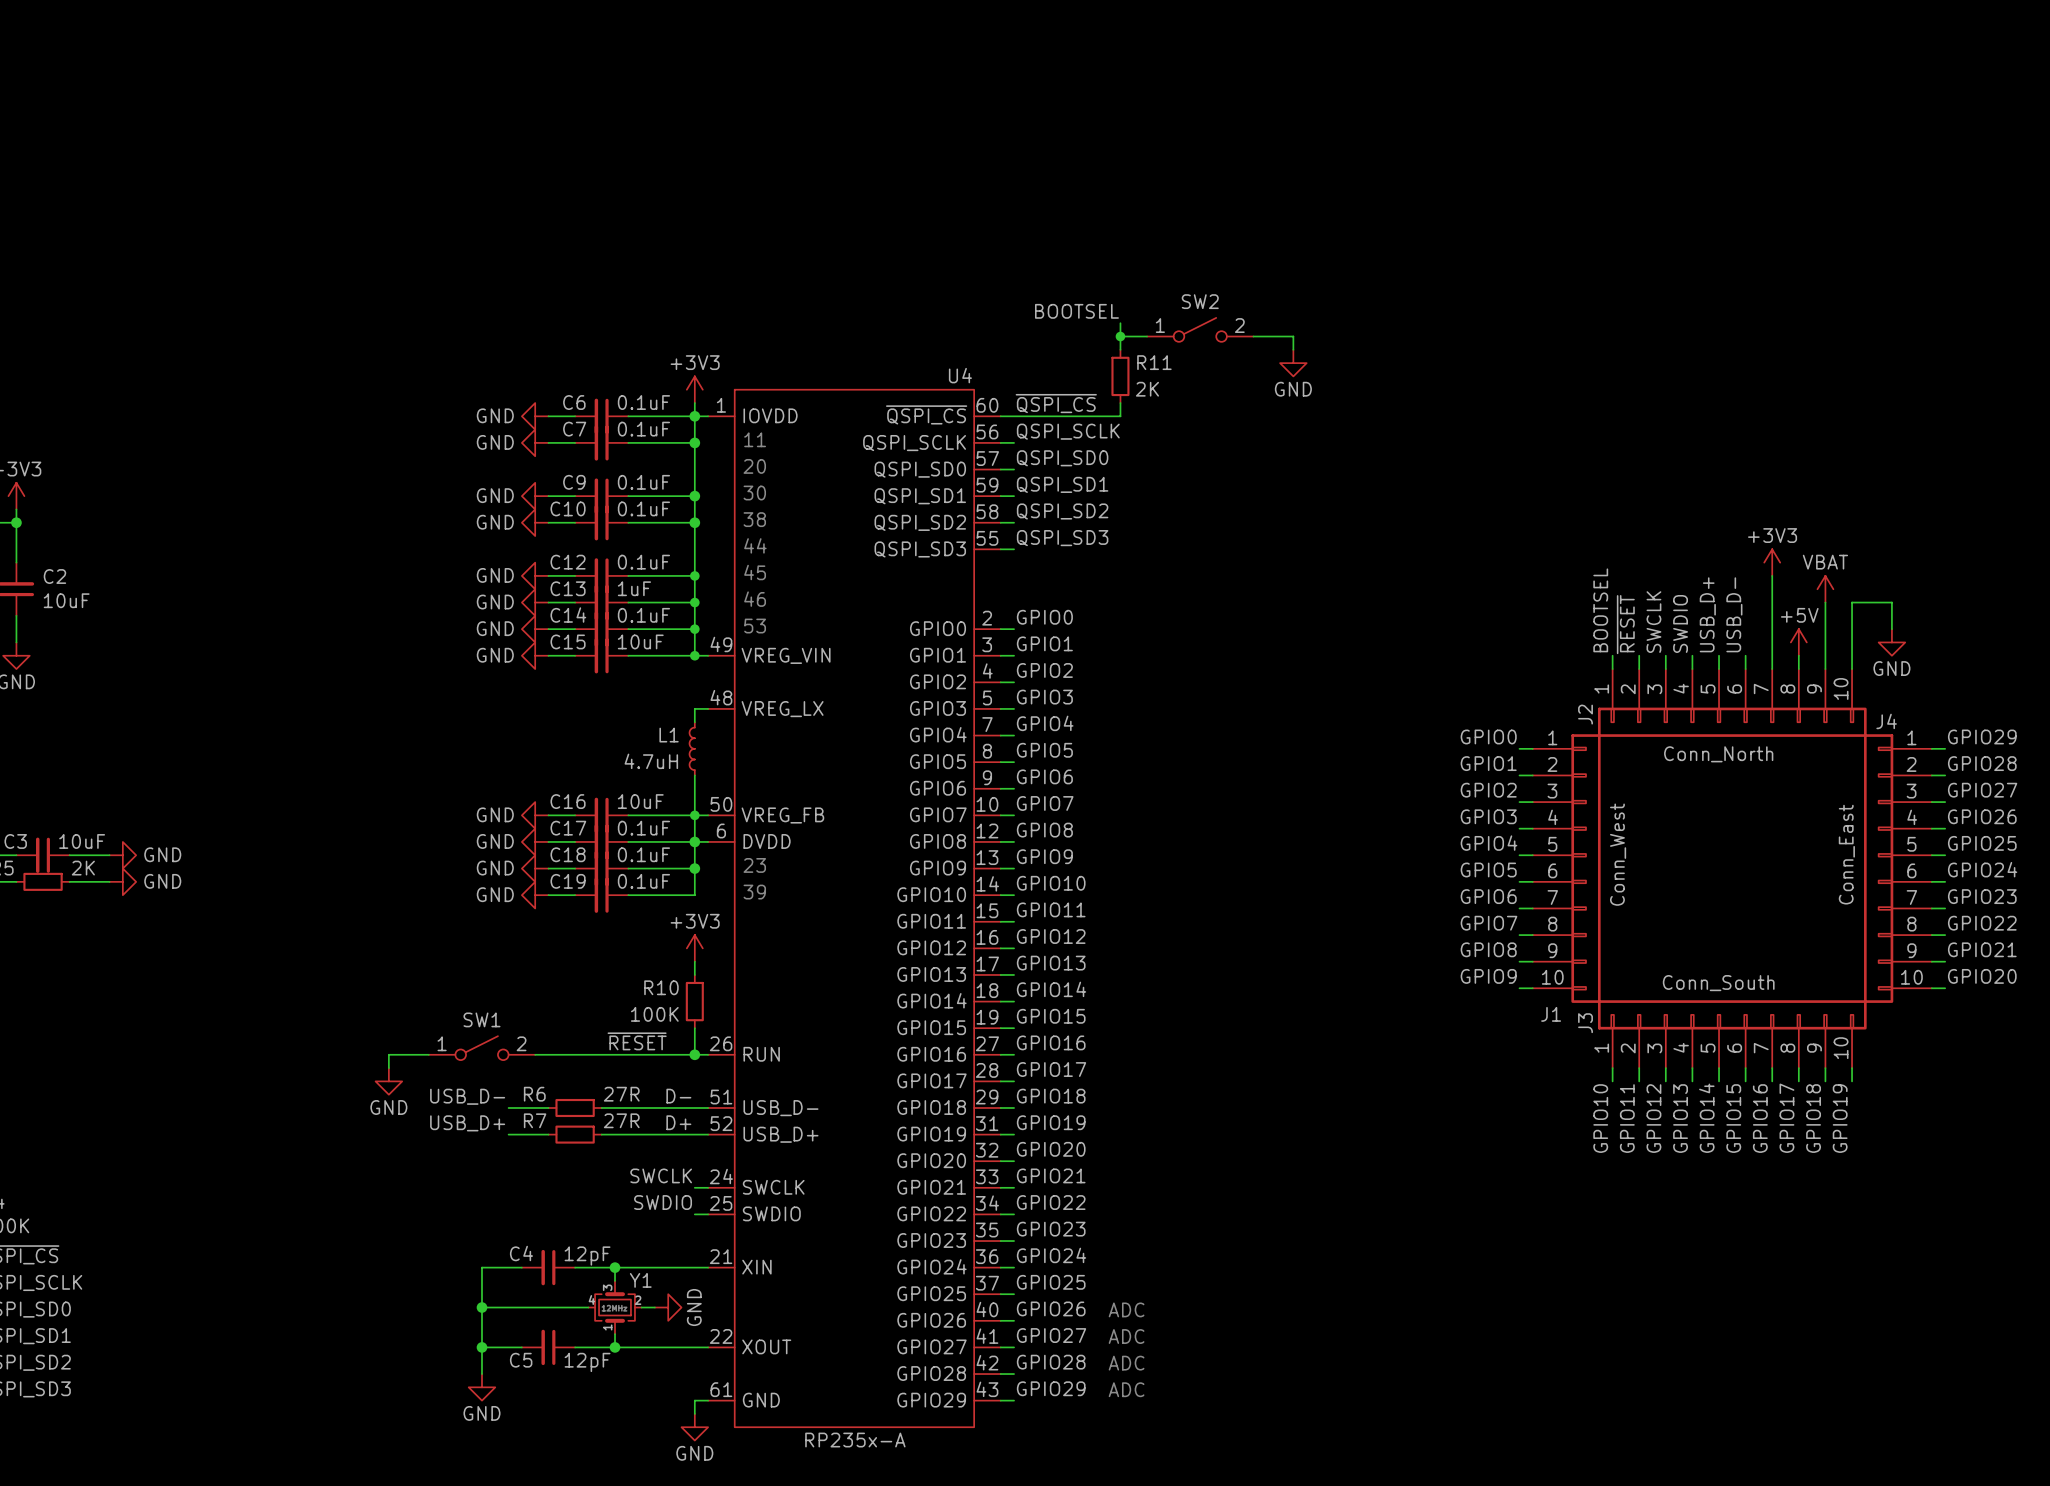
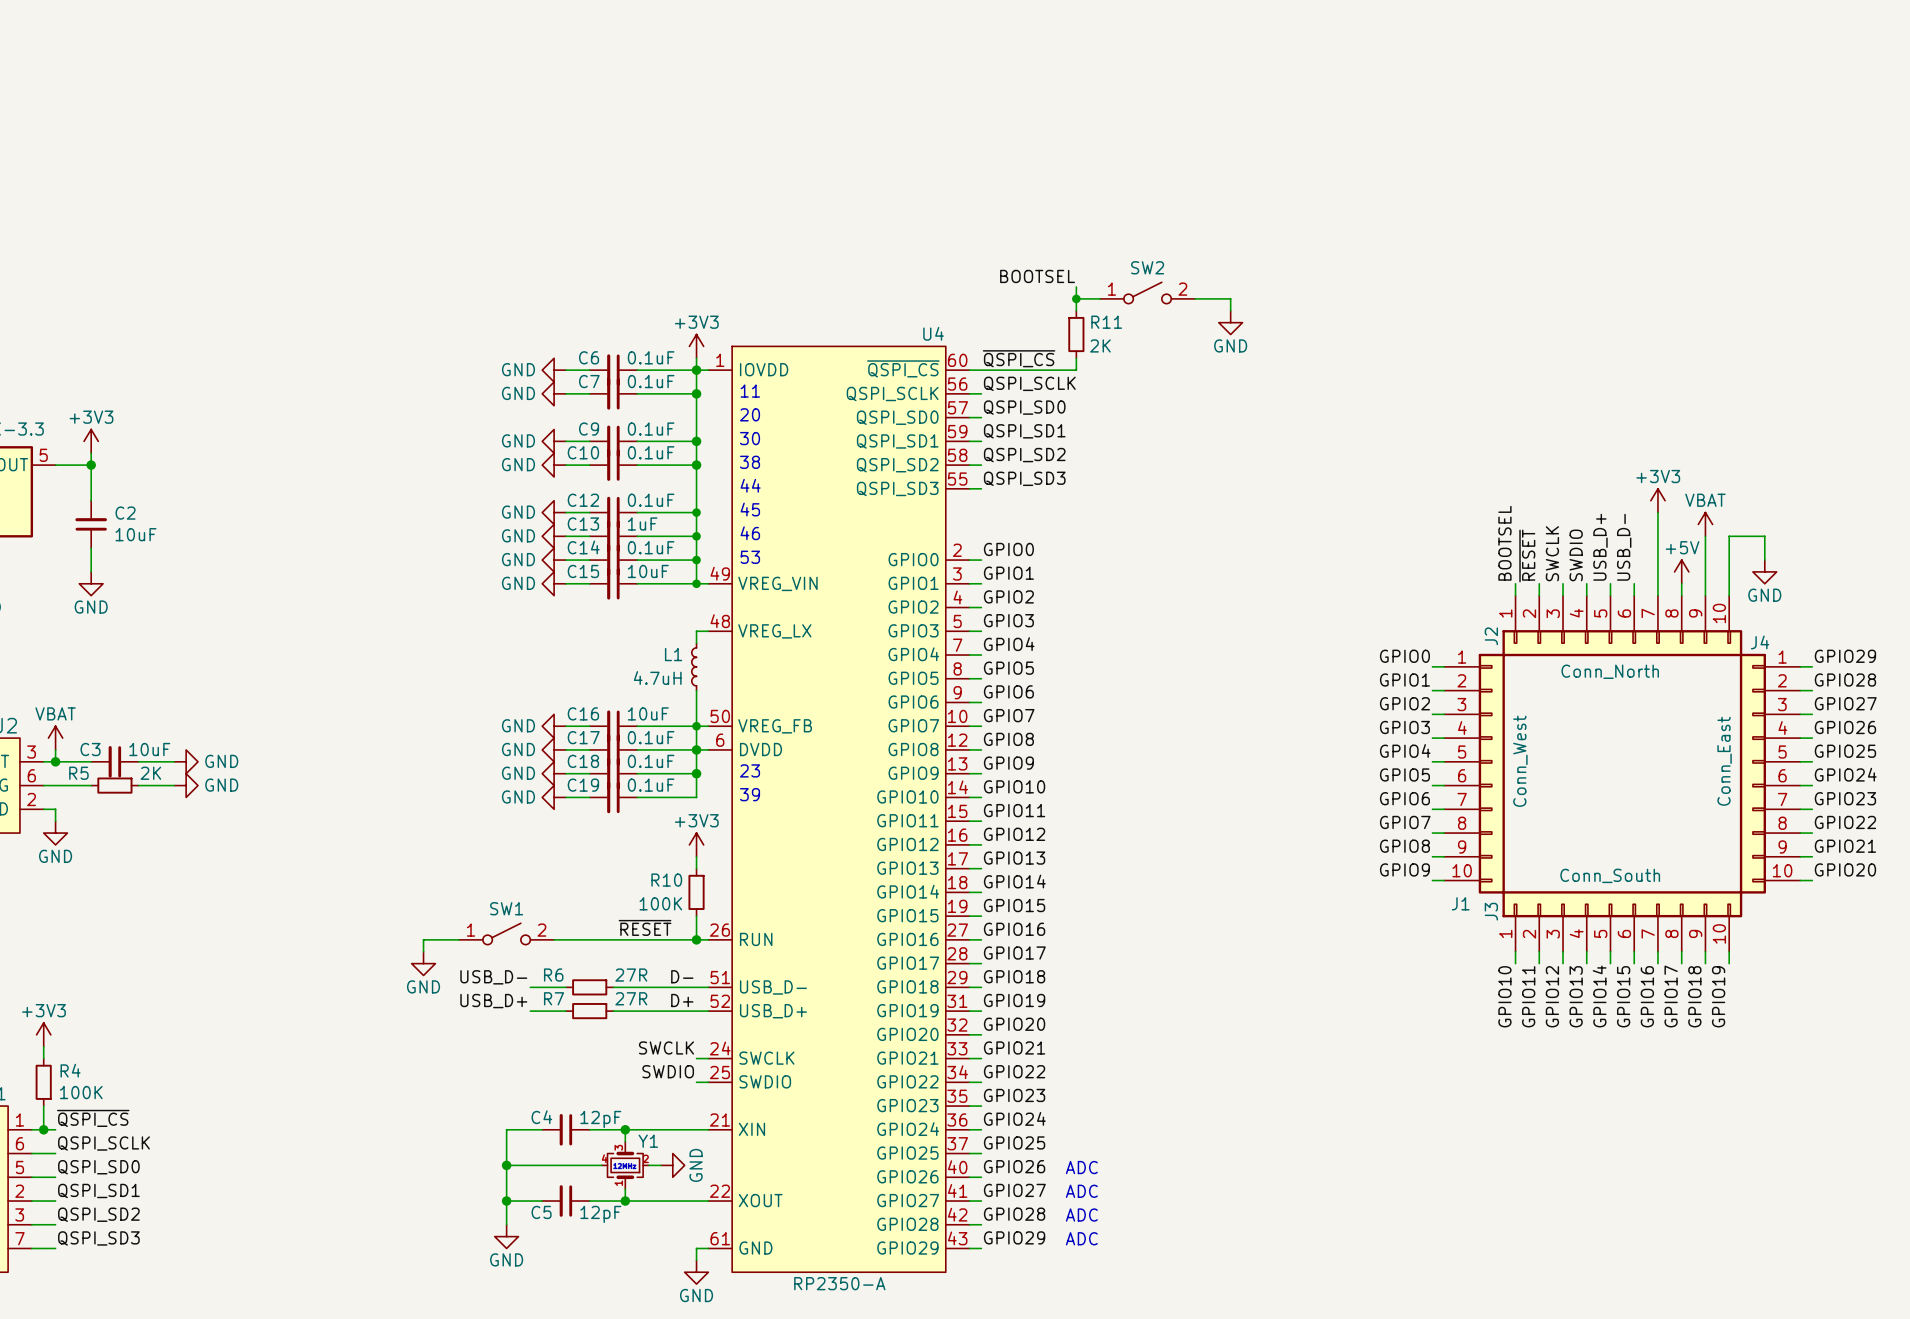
U4 value: RP235x-A (855, 1440) -> RP2350-A (839, 1283)

